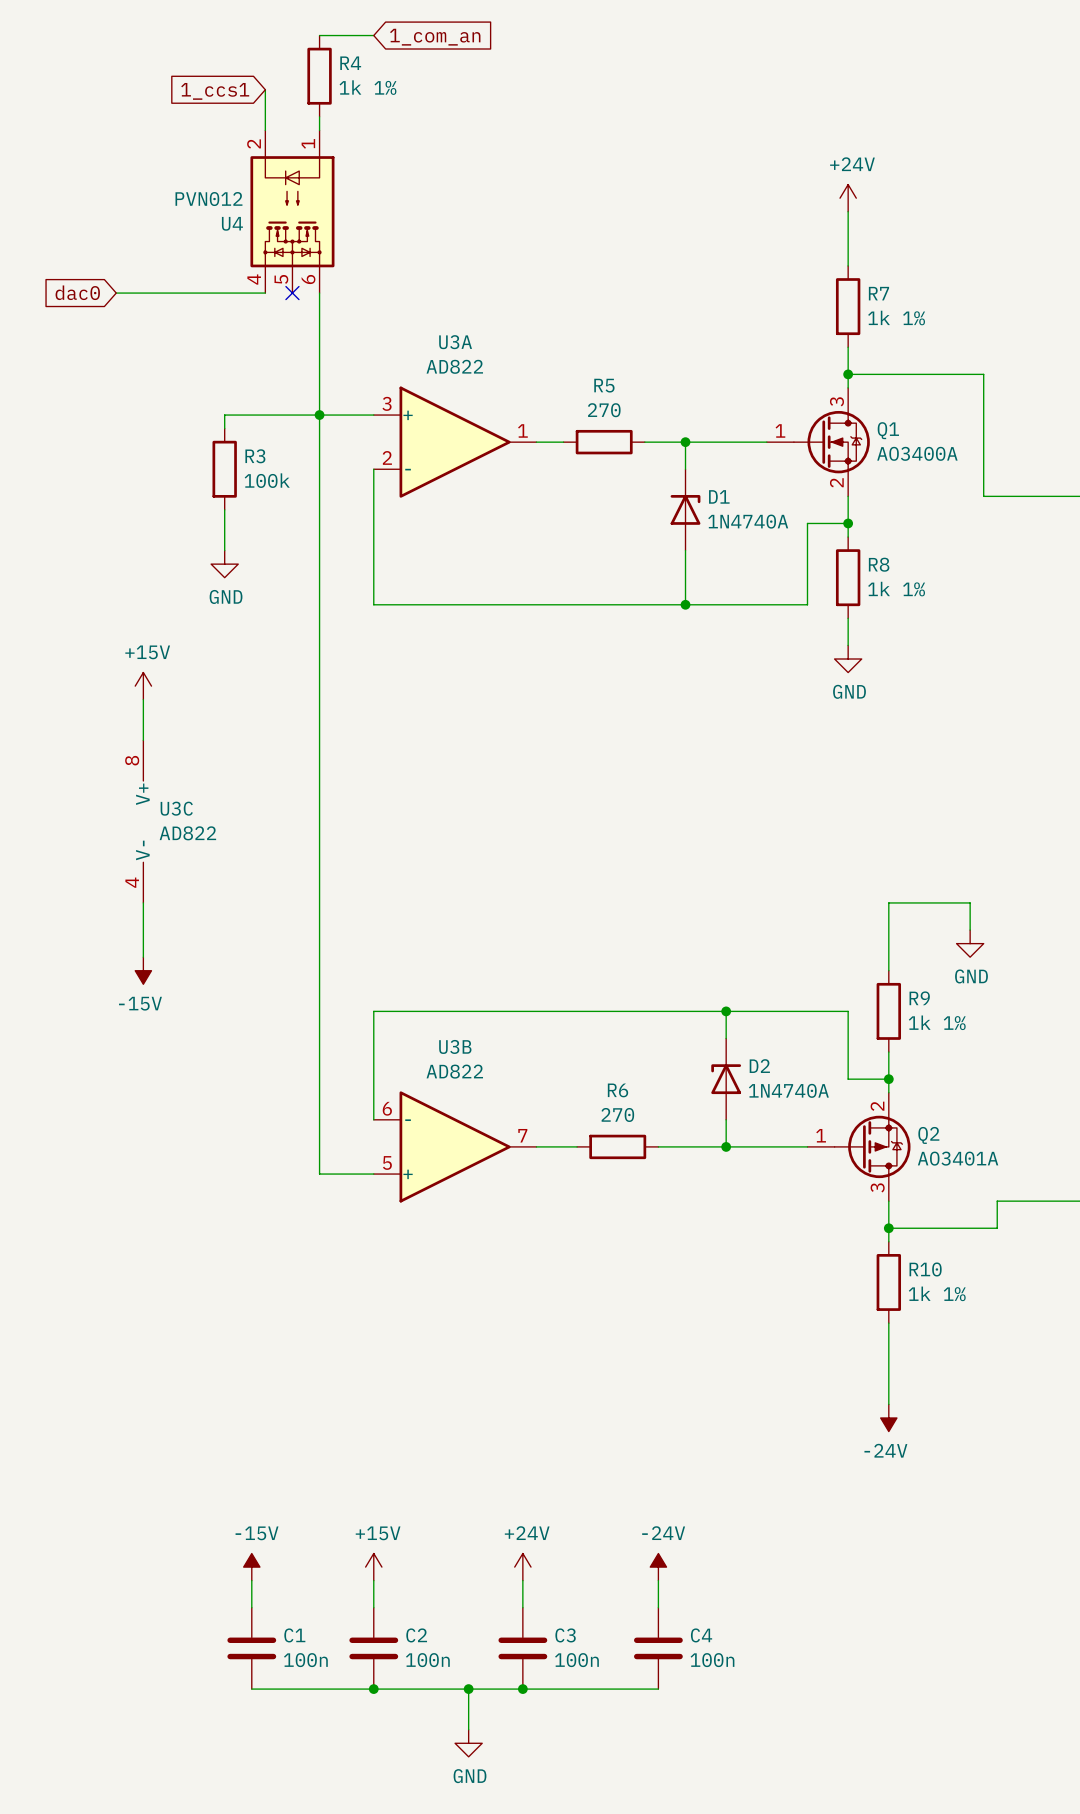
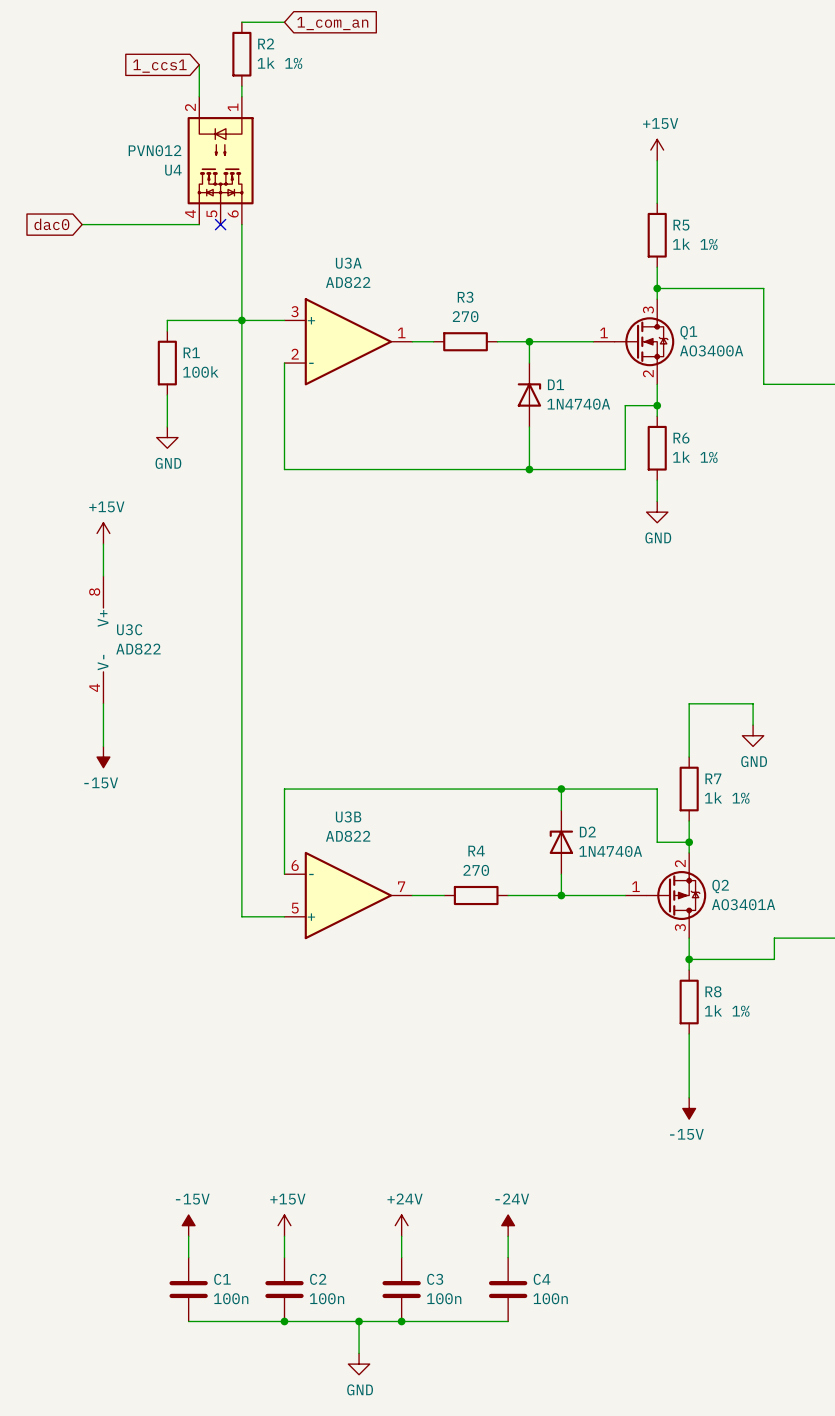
R4 name: R4 (350, 63) -> R2 (266, 43)
power symbol: +24V (848, 198) -> +15V (657, 150)
R7 name: R7 (878, 293) -> R5 (681, 225)
R5 name: R5 (604, 385) -> R3 (465, 297)
R3 name: R3 (255, 456) -> R1 (191, 352)
R8 name: R8 (879, 564) -> R6 (681, 438)
R9 name: R9 (919, 998) -> R7 (713, 778)
R6 name: R6 (617, 1090) -> R4 (476, 851)
R10 name: R10 (925, 1269) -> R8 (713, 991)
power symbol: -24V (888, 1418) -> -15V (689, 1108)

